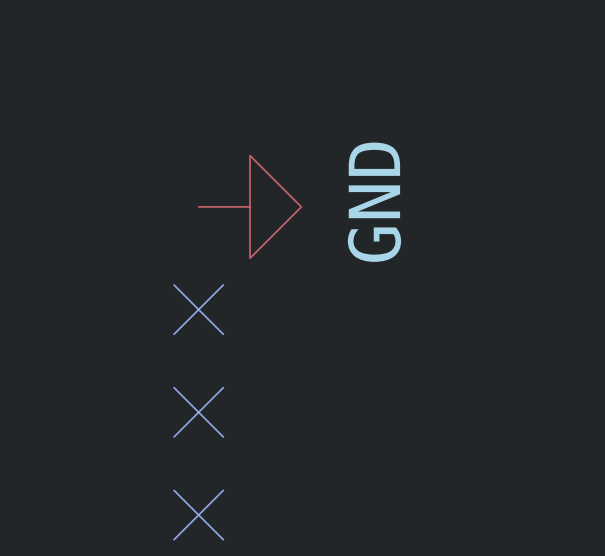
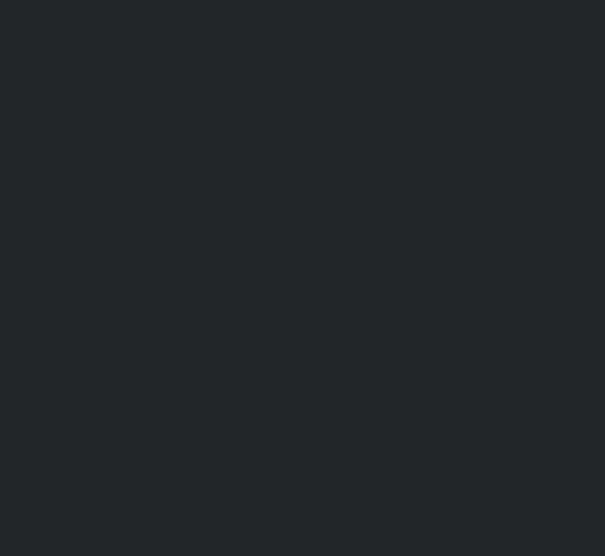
power symbol: GND (250, 206) -> none
no-connect mark: (198, 309) -> none
no-connect mark: (198, 412) -> none
no-connect mark: (198, 515) -> none

